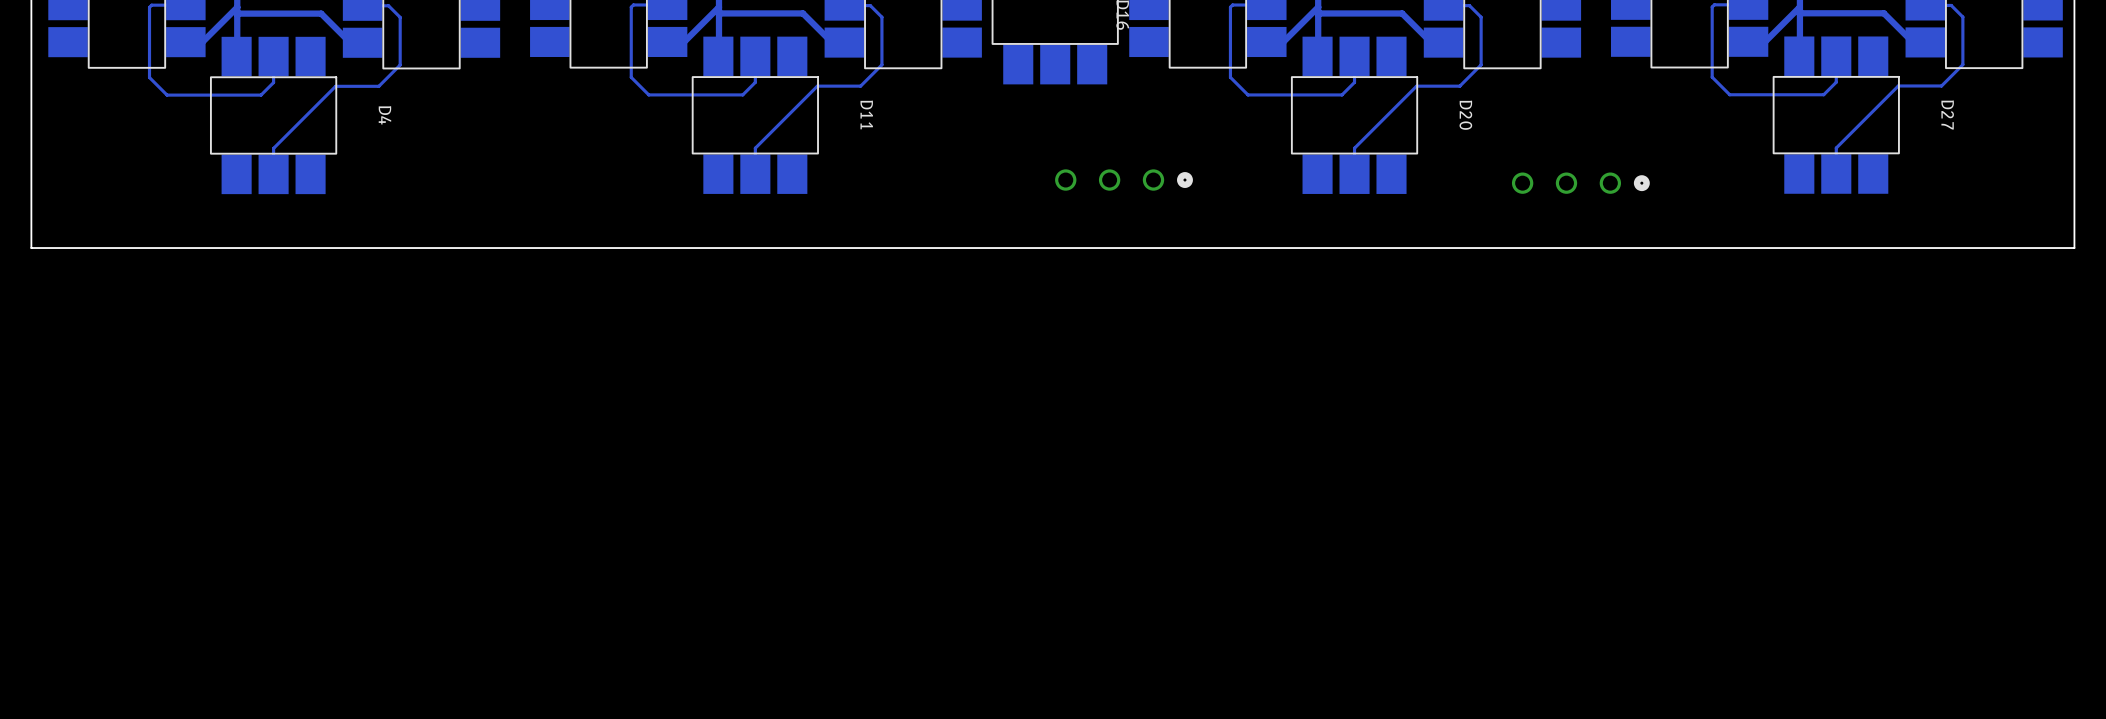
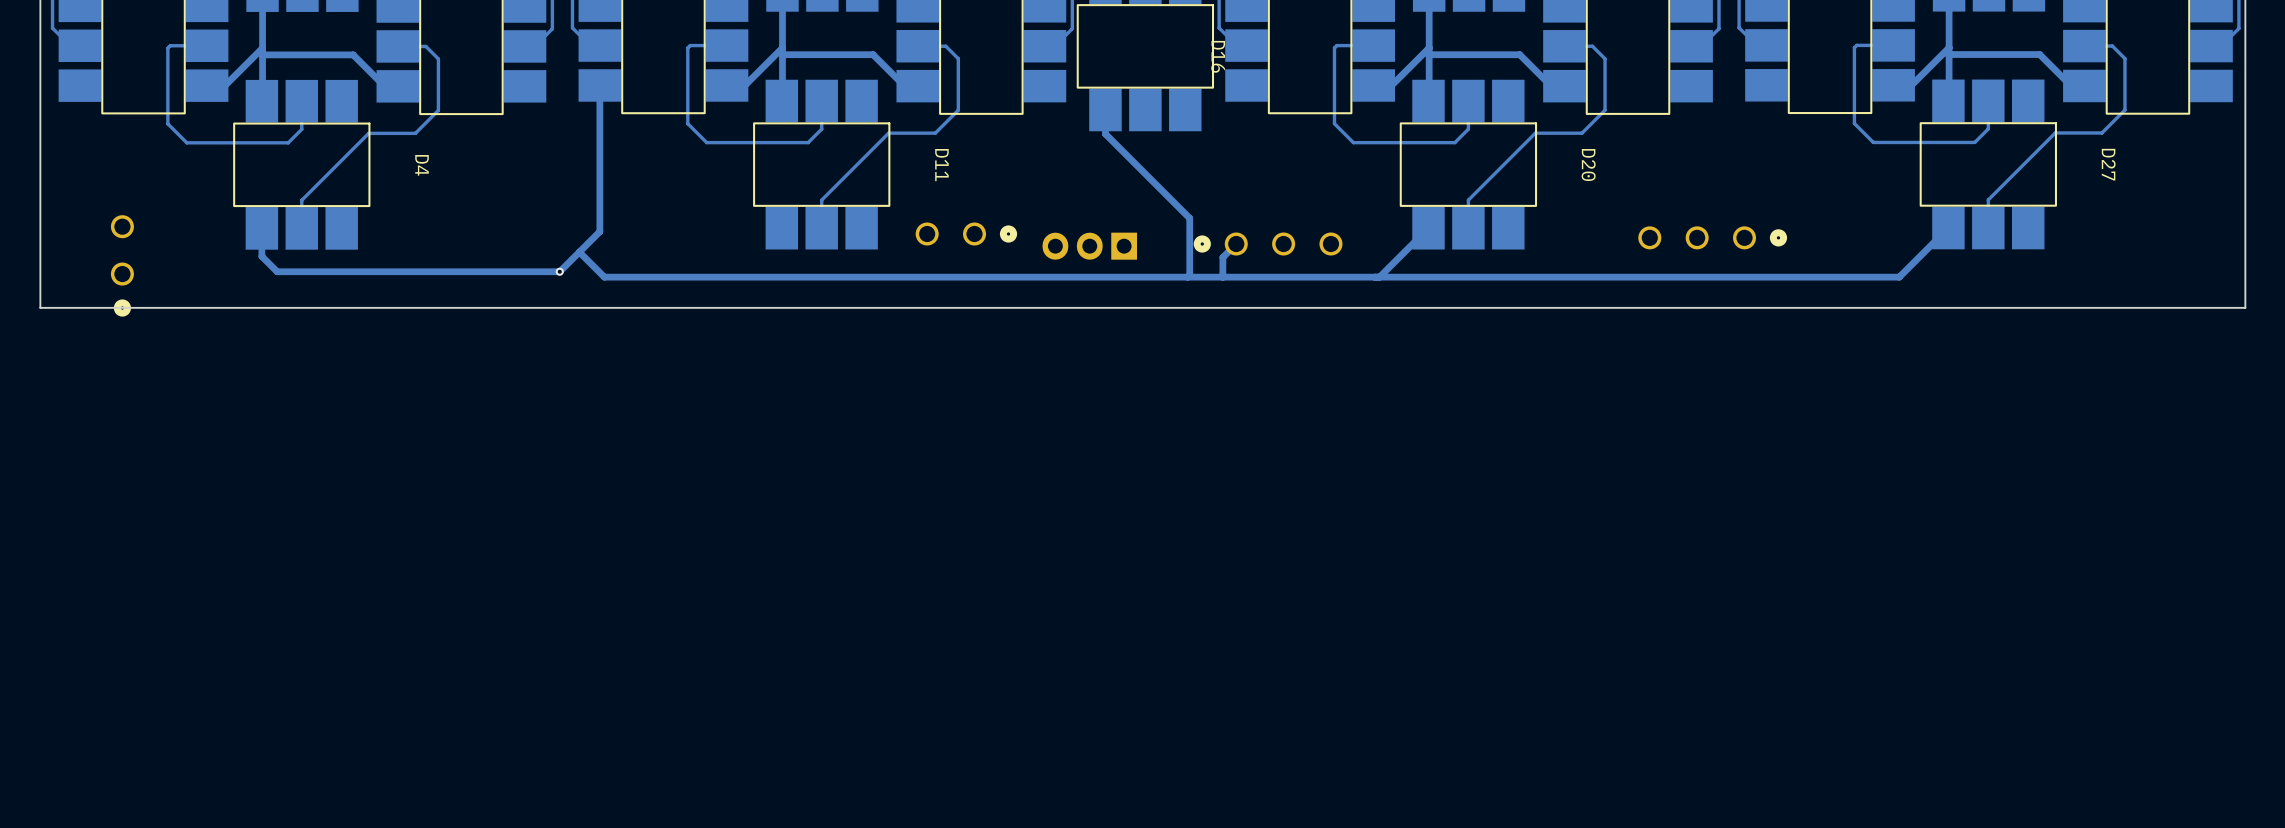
track: none -> (599, 85) (599, 231) (559, 271) (277, 271) (261, 256) (261, 228)
track: none -> (1105, 109) (1105, 134) (1189, 218) (1189, 275) (1187, 277)
track: none -> (1428, 228) (1379, 277)
track: none -> (1948, 228) (1899, 277) (604, 277) (579, 252)
part: none -> (966, 234)
part rotation: 0° (1124, 180) -> 180° (1268, 244)
track: none -> (1236, 244) (1222, 257) (1222, 277)
part: none -> (1089, 246)
part: none -> (122, 265)
via: none -> (559, 271)

